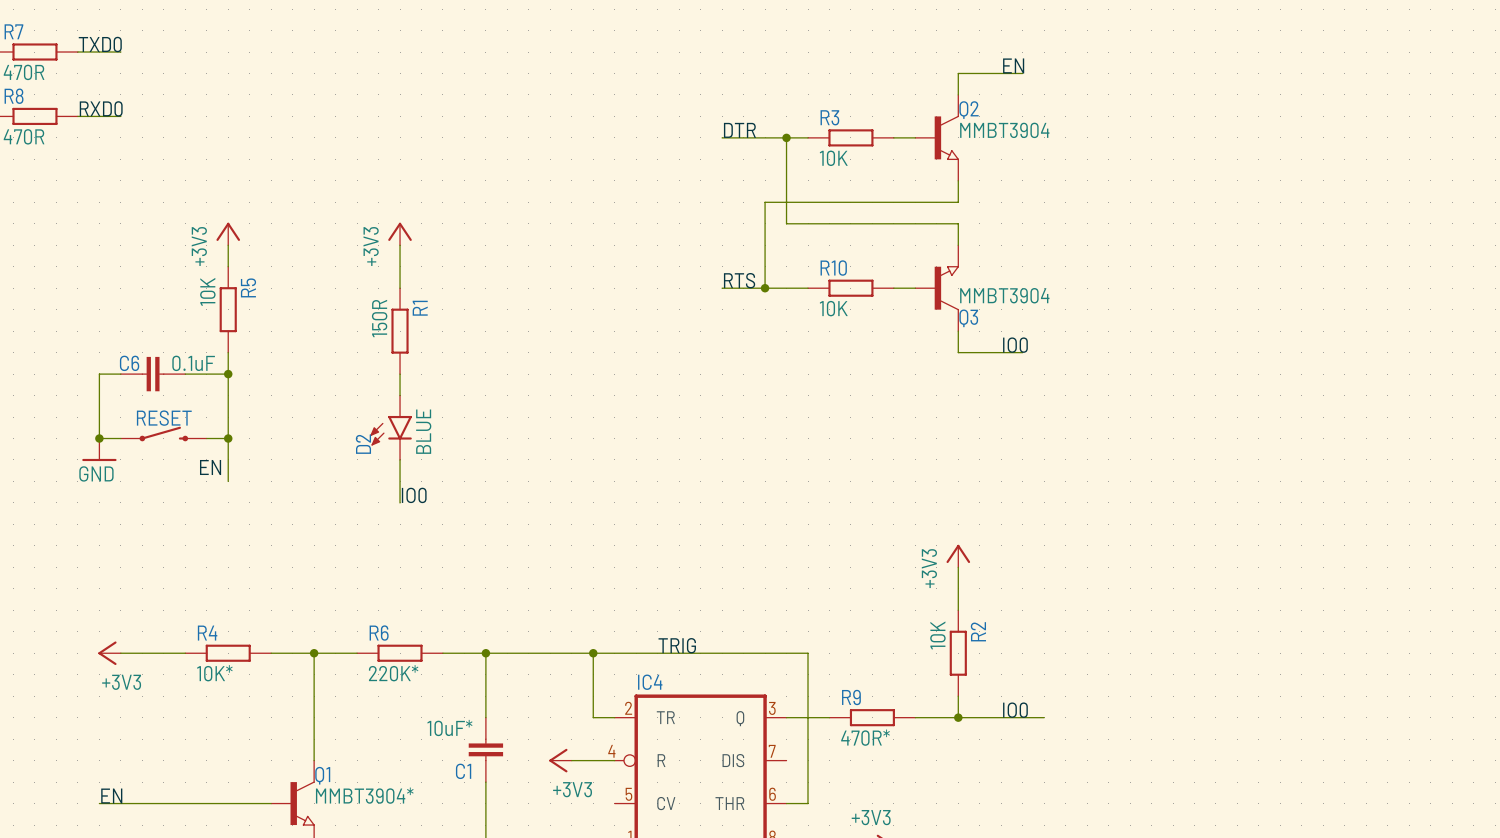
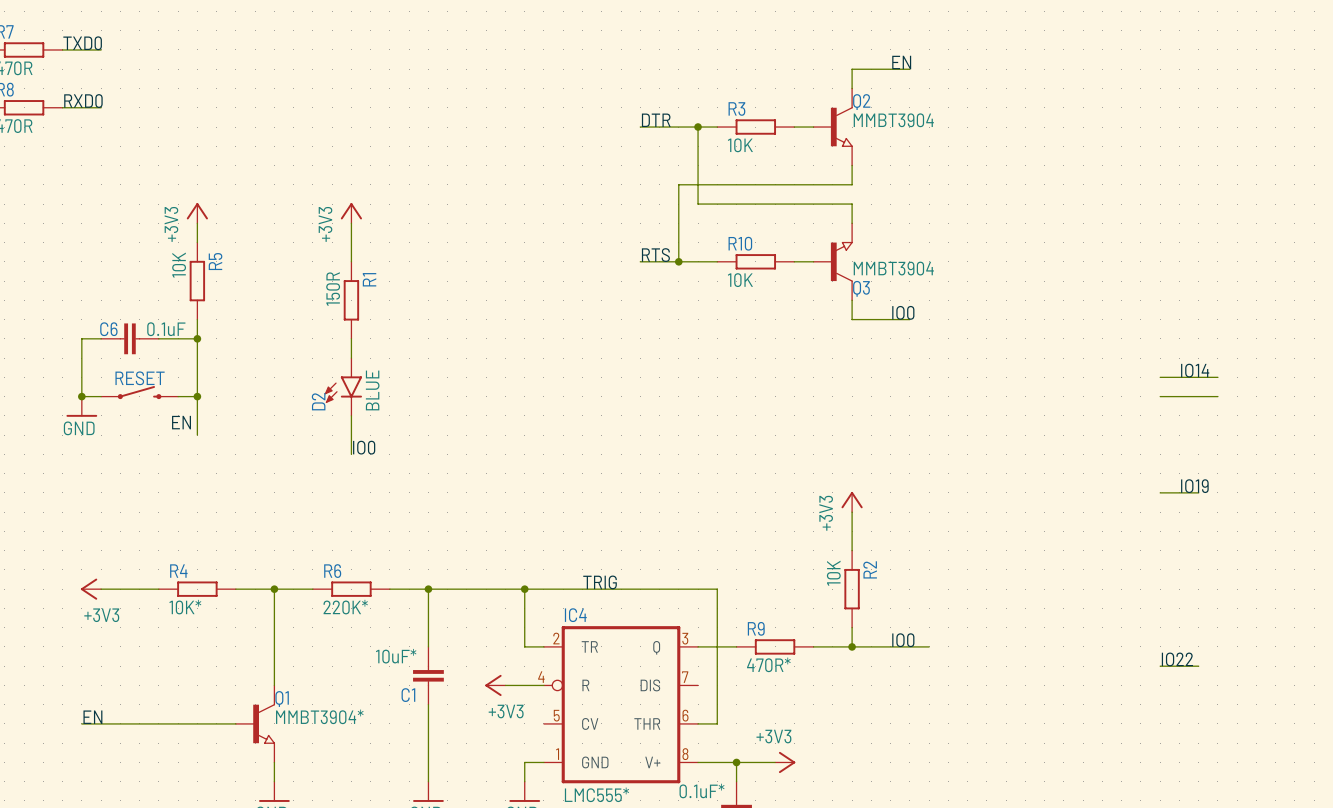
label: none -> IO14 (1195, 370)
wire: none -> (1160, 377) (1217, 377)
wire: none -> (1160, 396) (1217, 396)
label: none -> IO19 (1194, 486)
wire: none -> (1160, 492) (1198, 492)
label: none -> IO22 (1177, 659)
wire: none -> (1160, 666) (1198, 666)

